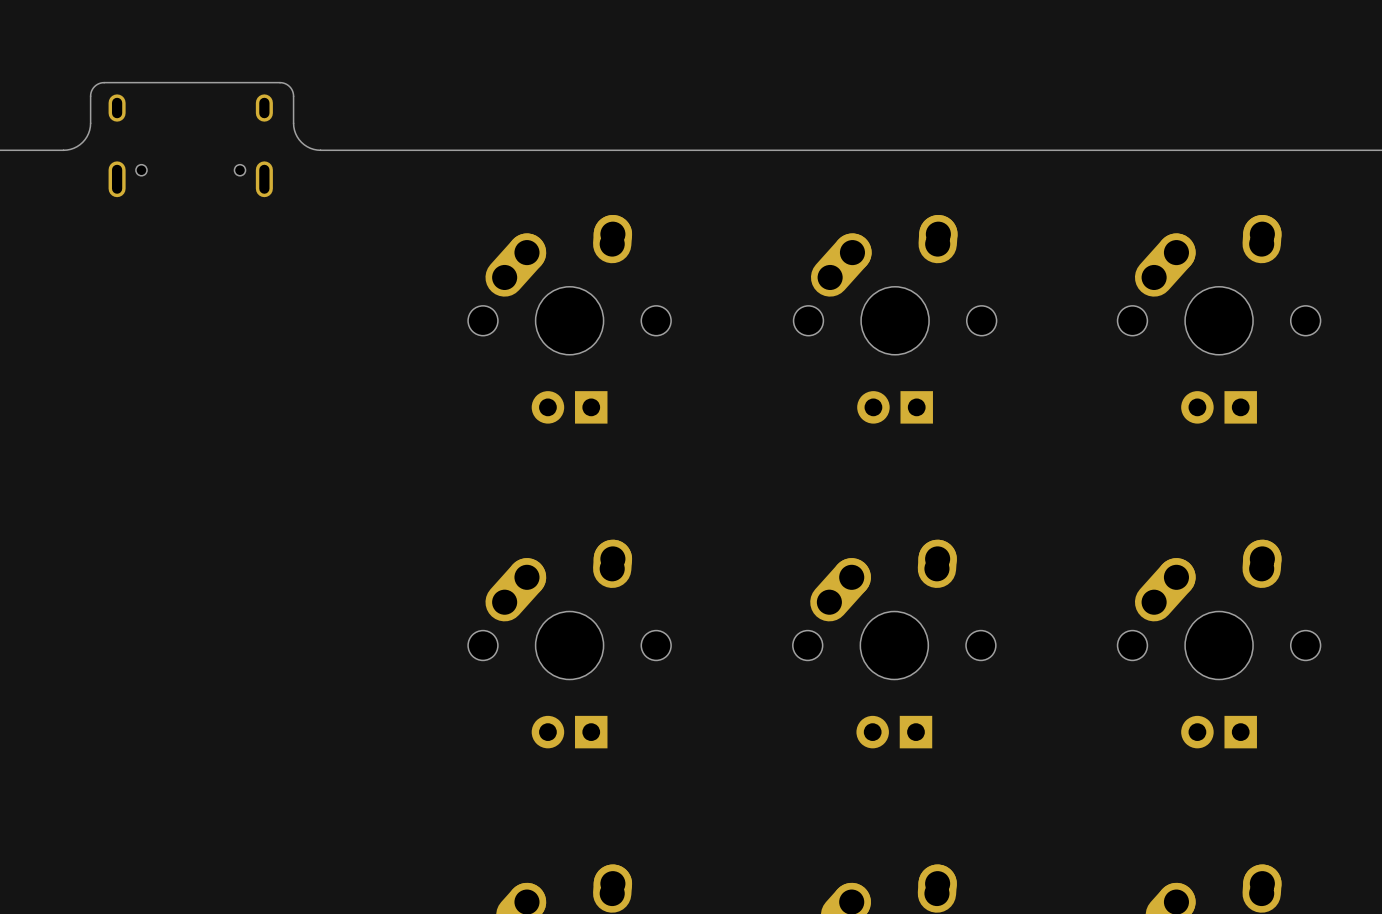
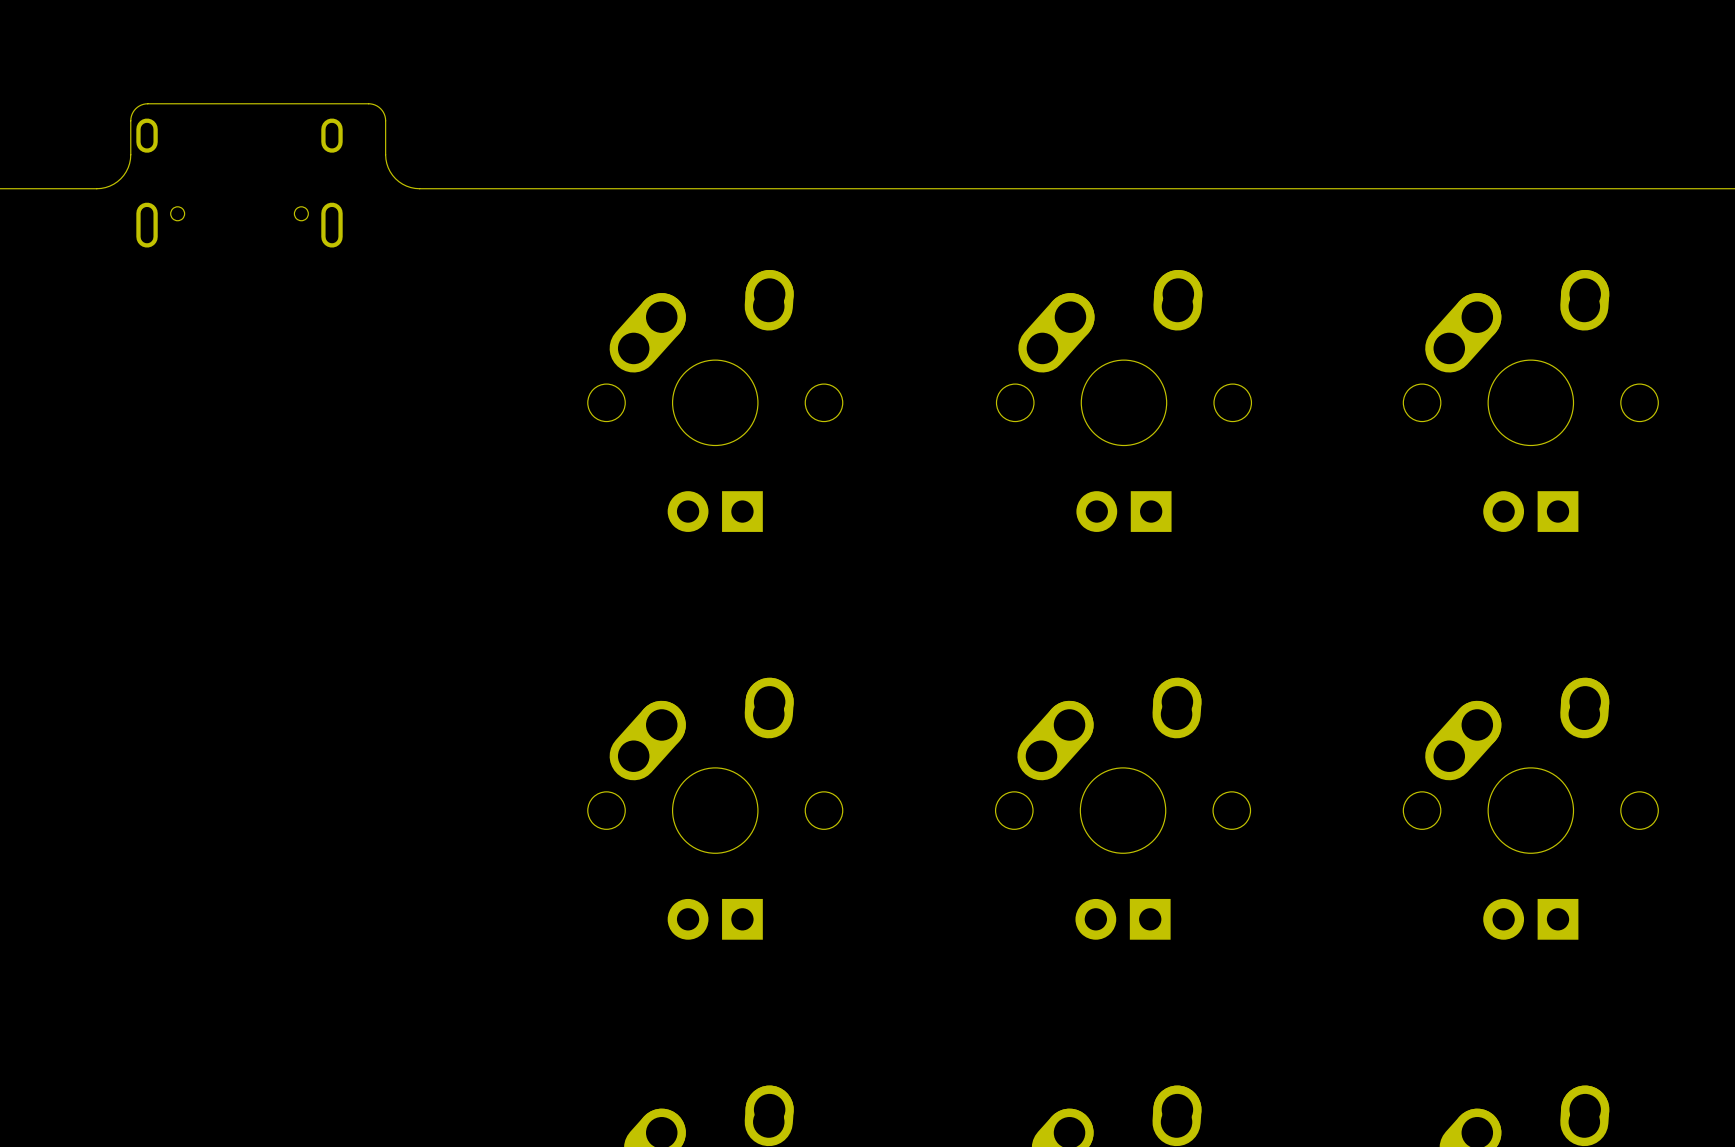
board edge: (117, 82) (100, 83) (93, 87) (90, 94) (88, 133) (80, 144) (63, 150) -> (147, 103) (137, 107) (131, 116) (130, 159) (123, 175) (117, 181) (105, 187) (79, 188)
board edge: (280, 82) (288, 85) (293, 92) (293, 126) (299, 139) (313, 149) (334, 150) -> (351, 103) (373, 104) (382, 110) (385, 118) (385, 154) (388, 167) (395, 178) (402, 184) (419, 188)

